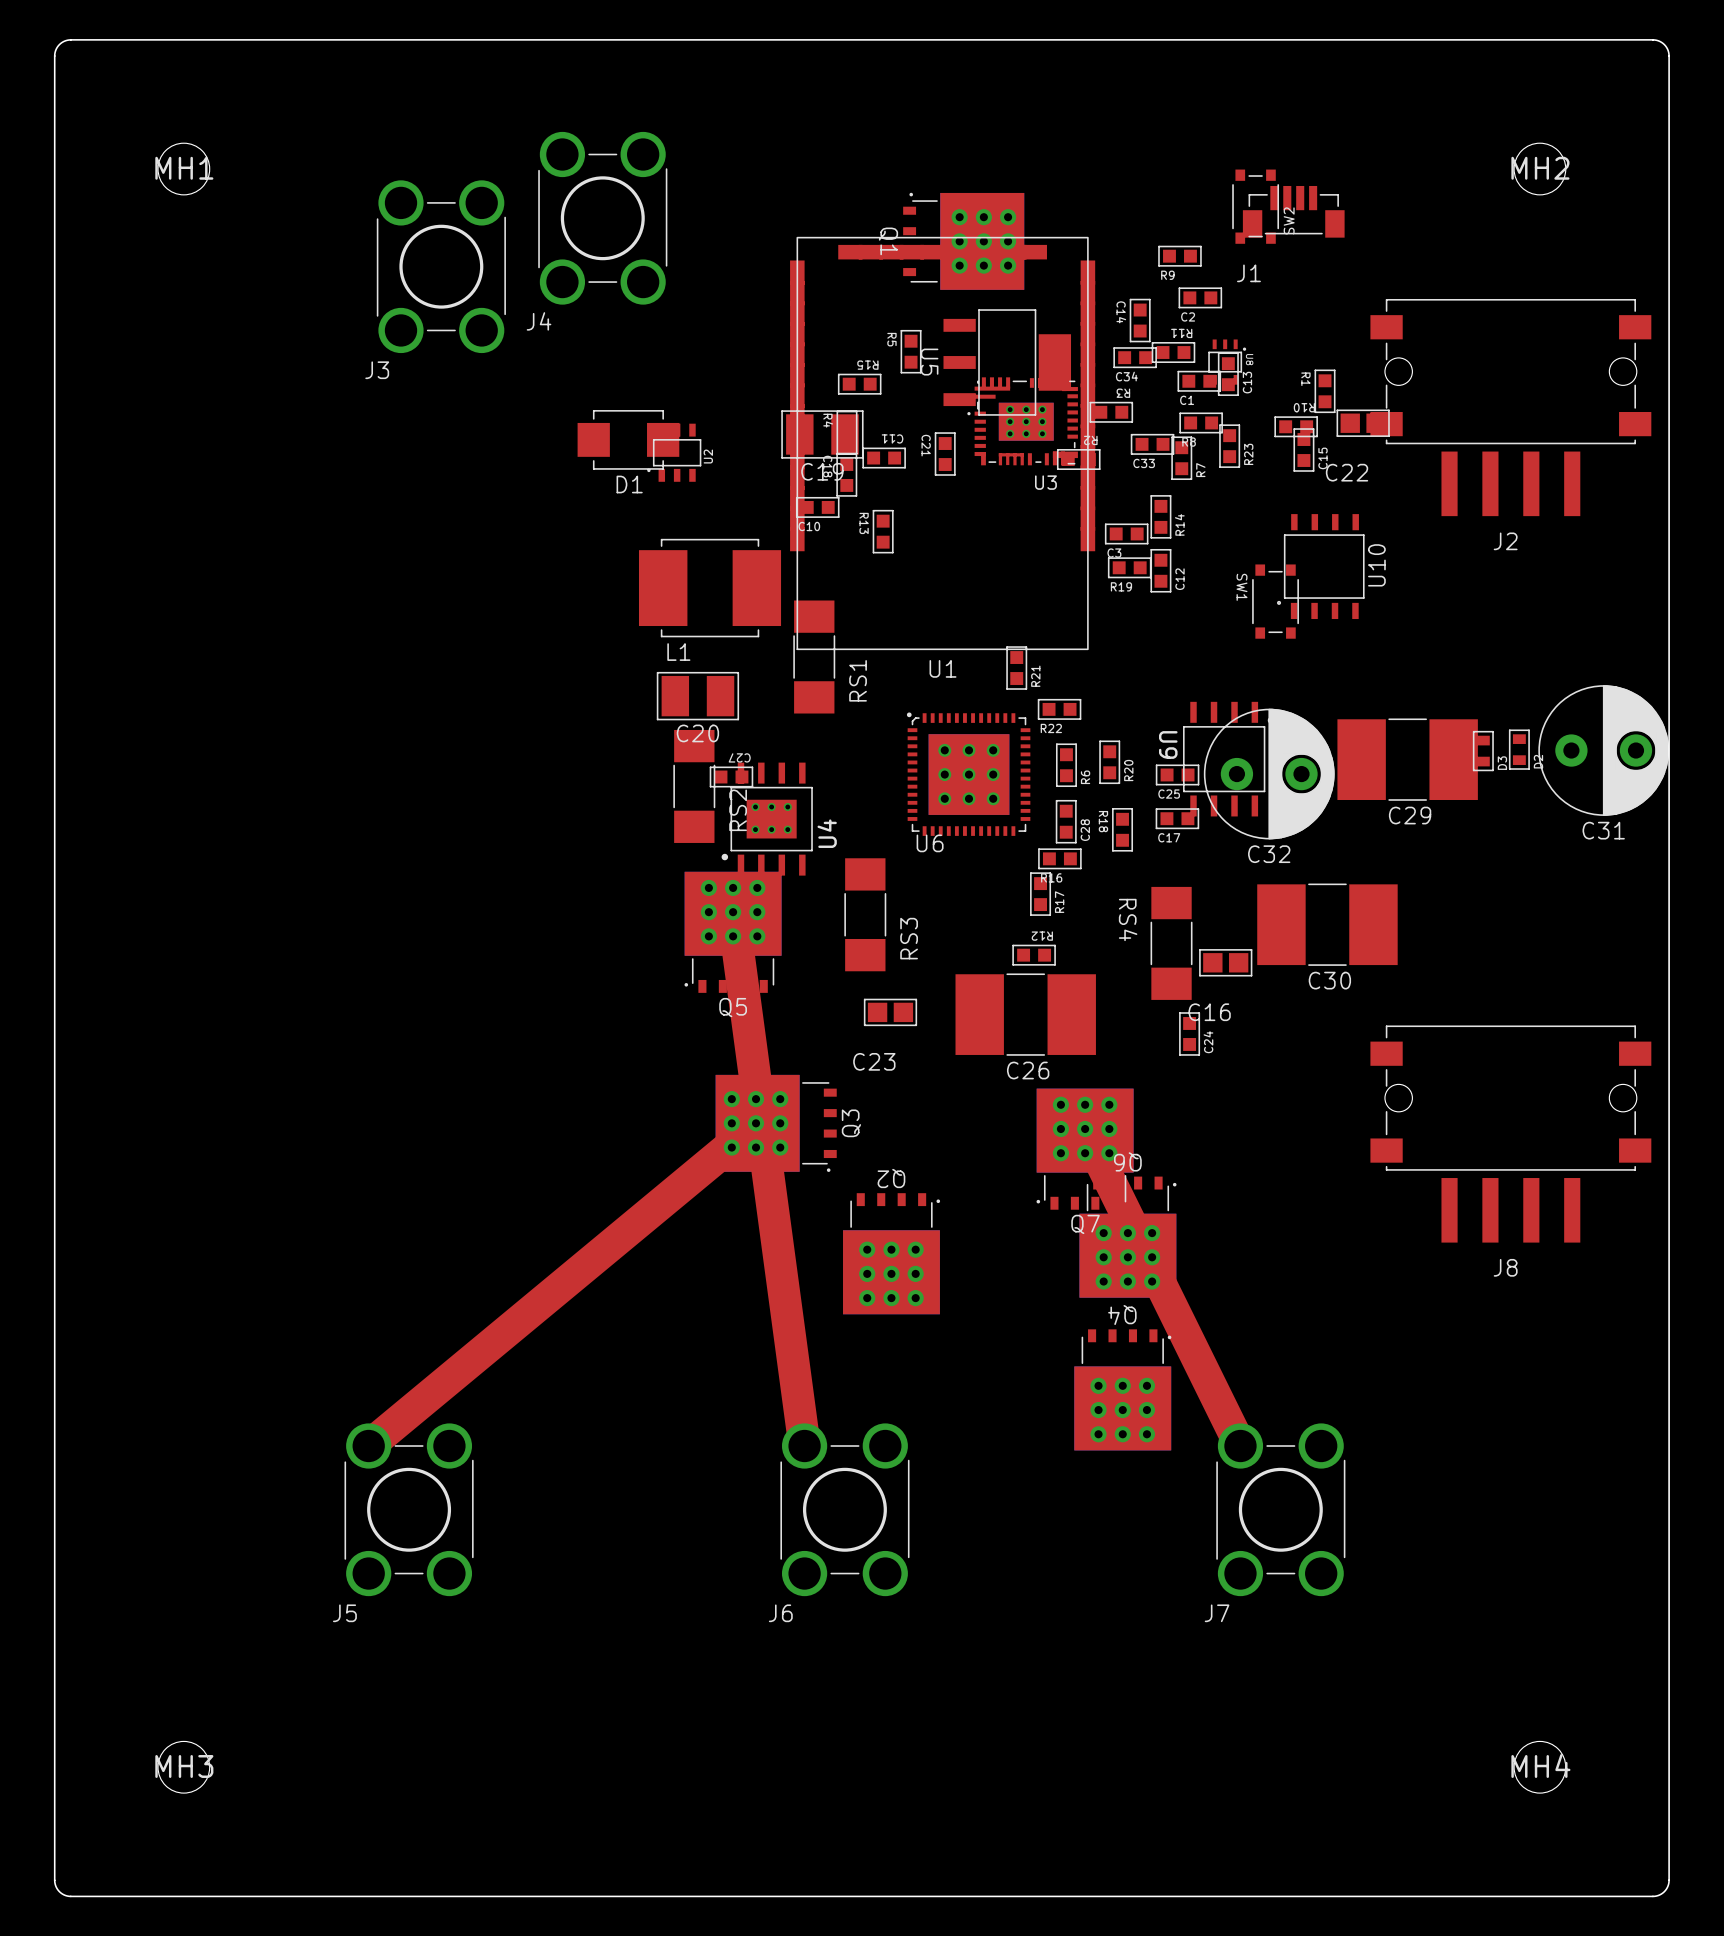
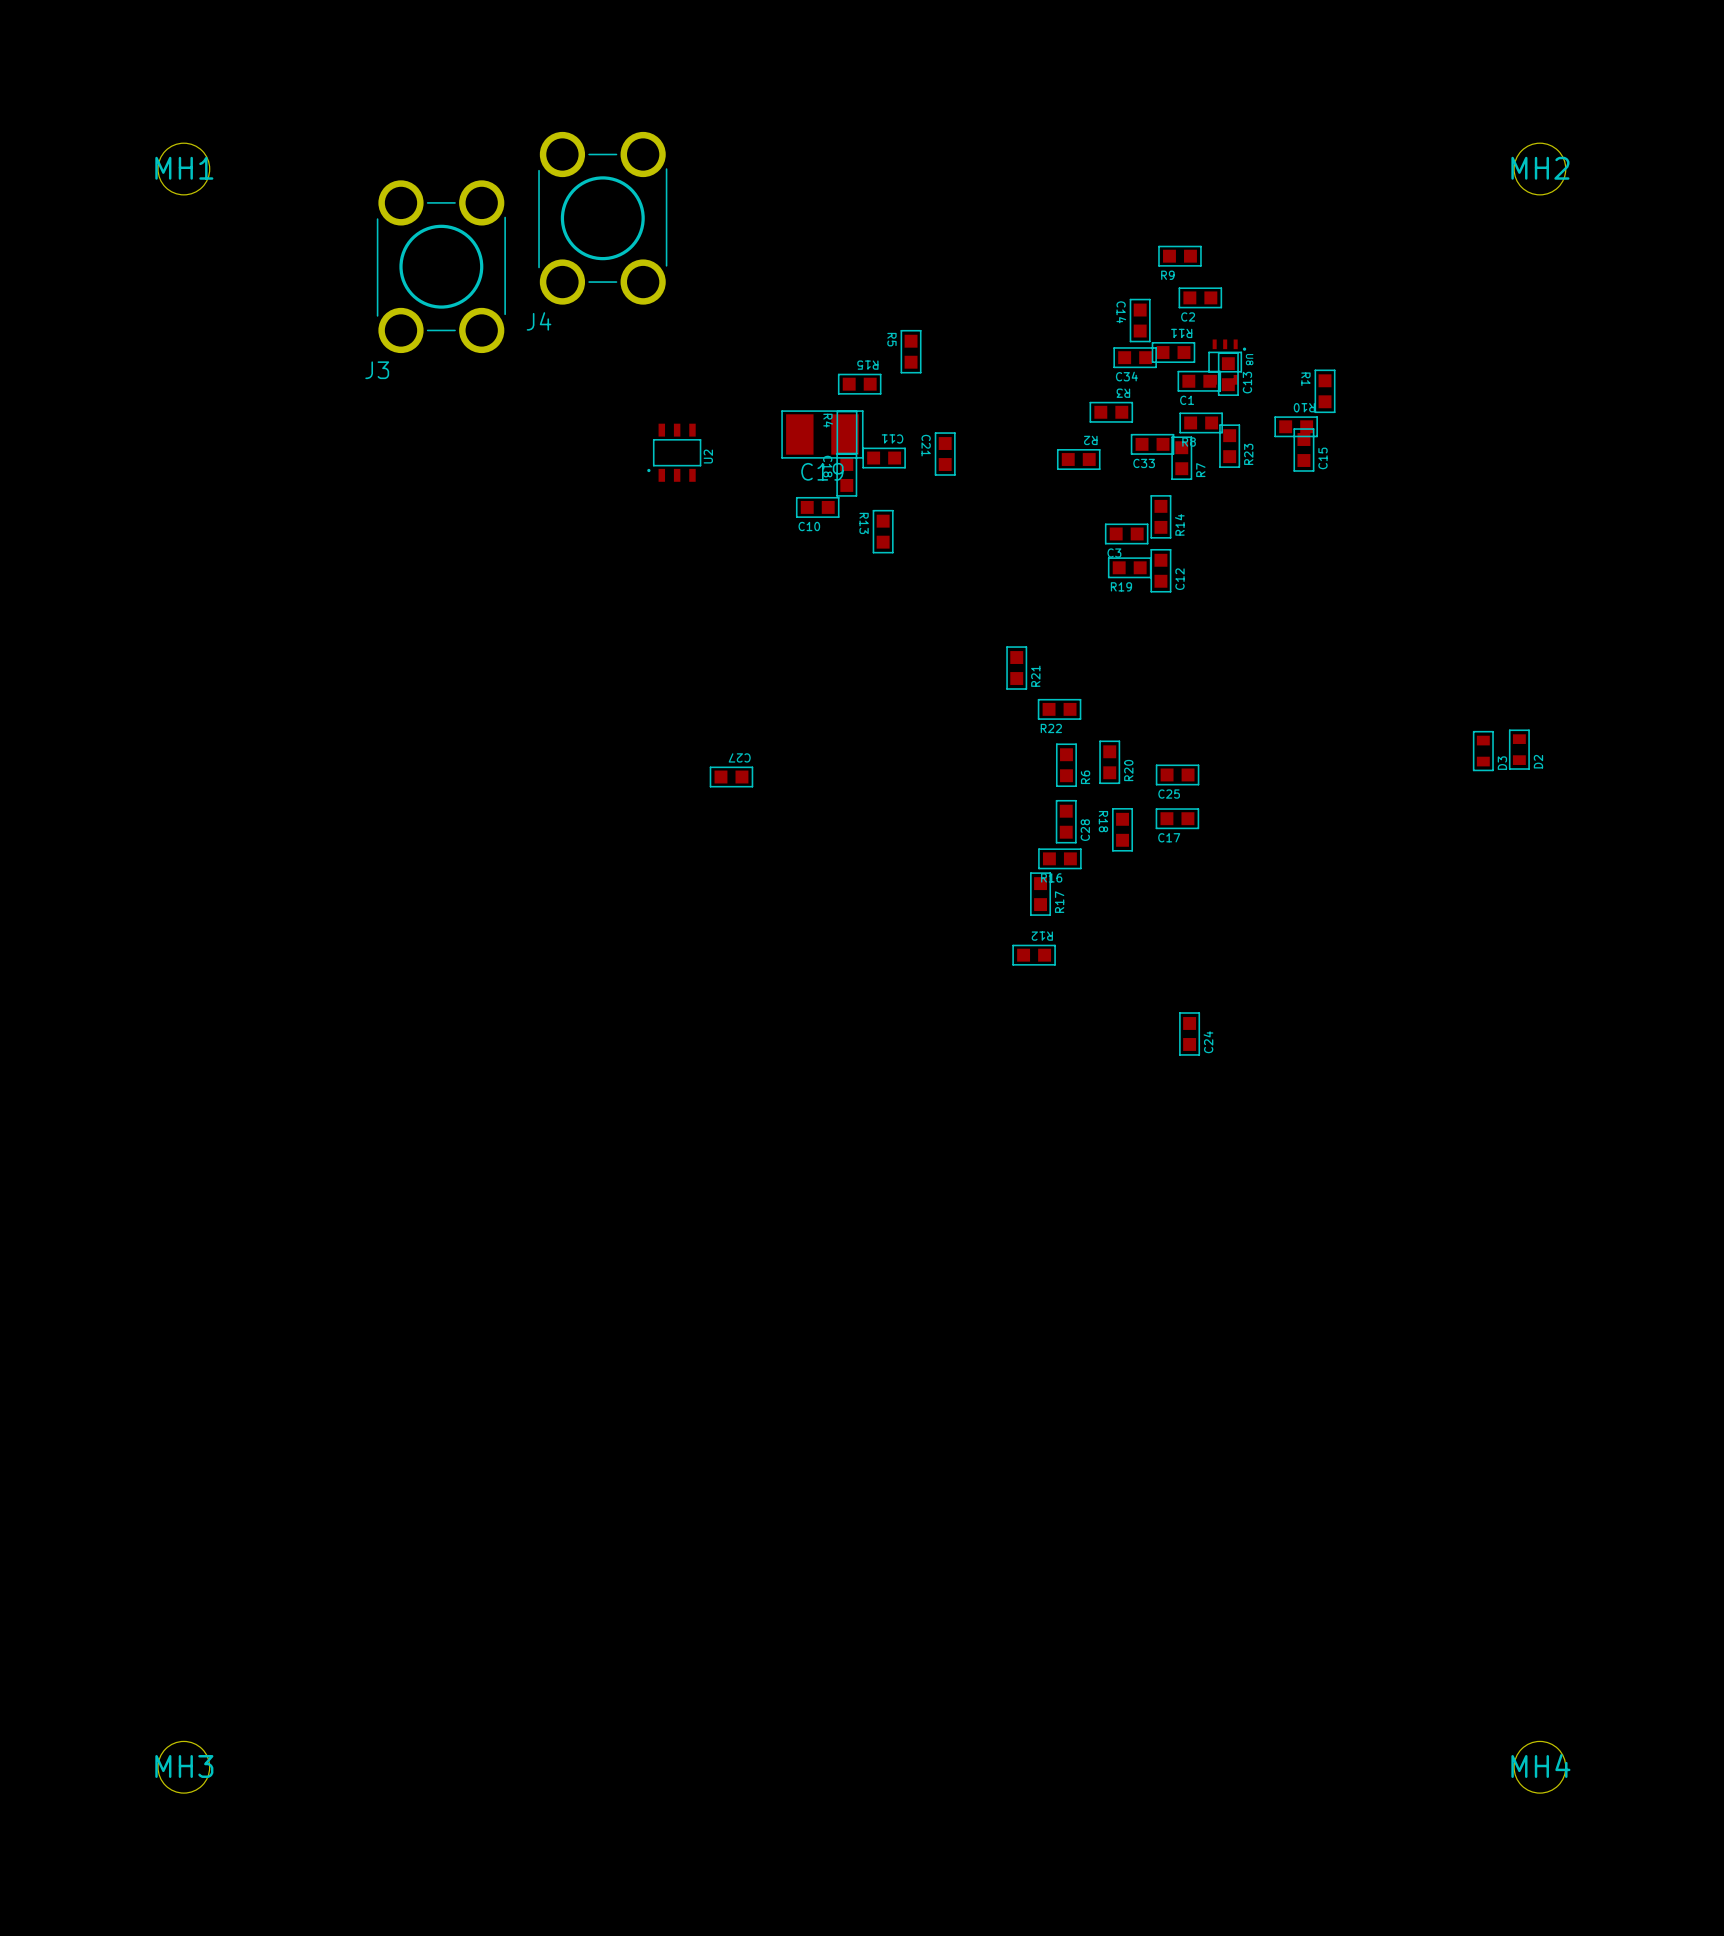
board edge: (70, 39) (1652, 39) (1659, 41) (1665, 45) (1669, 56) (1669, 1880) (1667, 1887) (1663, 1892) (1652, 1896) (70, 1896) (63, 1894) (58, 1890) (54, 1880) (54, 56) (59, 44) (70, 39) -> none
SW2: (1255, 206) -> none
J1: (1293, 211) -> none
Q1: (963, 241) -> none
U5: (1007, 362) -> none
J2: (1510, 407) -> none
U3: (1022, 421) -> none
C22: (1363, 423) -> none
D1: (628, 439) -> none
U1: (942, 443) -> none
U10: (1320, 566) -> none
L1: (710, 588) -> none
SW1: (1275, 601) -> none
RS1: (814, 657) -> none
C20: (697, 696) -> none
C31: (1603, 750) -> none
U9: (1228, 759) -> none
C29: (1407, 759) -> none
U6: (968, 774) -> none
C32: (1269, 774) -> none
RS2: (694, 786) -> none
U4: (767, 819) -> none
top track: (733, 913) (804, 1446) -> none
RS3: (865, 914) -> none
C30: (1327, 924) -> none
Q5: (733, 932) -> none
RS4: (1171, 943) -> none
C16: (1225, 962) -> none
C23: (890, 1012) -> none
C26: (1025, 1014) -> none
top track: (757, 1123) (368, 1446) -> none
Q3: (776, 1123) -> none
top track: (1085, 1130) (1240, 1446) -> none
J8: (1510, 1134) -> none
Q7: (1085, 1149) -> none
Q6: (1127, 1237) -> none
Q2: (891, 1253) -> none
Q4: (1122, 1389) -> none
J5: (409, 1509) -> none
J6: (844, 1509) -> none
J7: (1280, 1509) -> none

